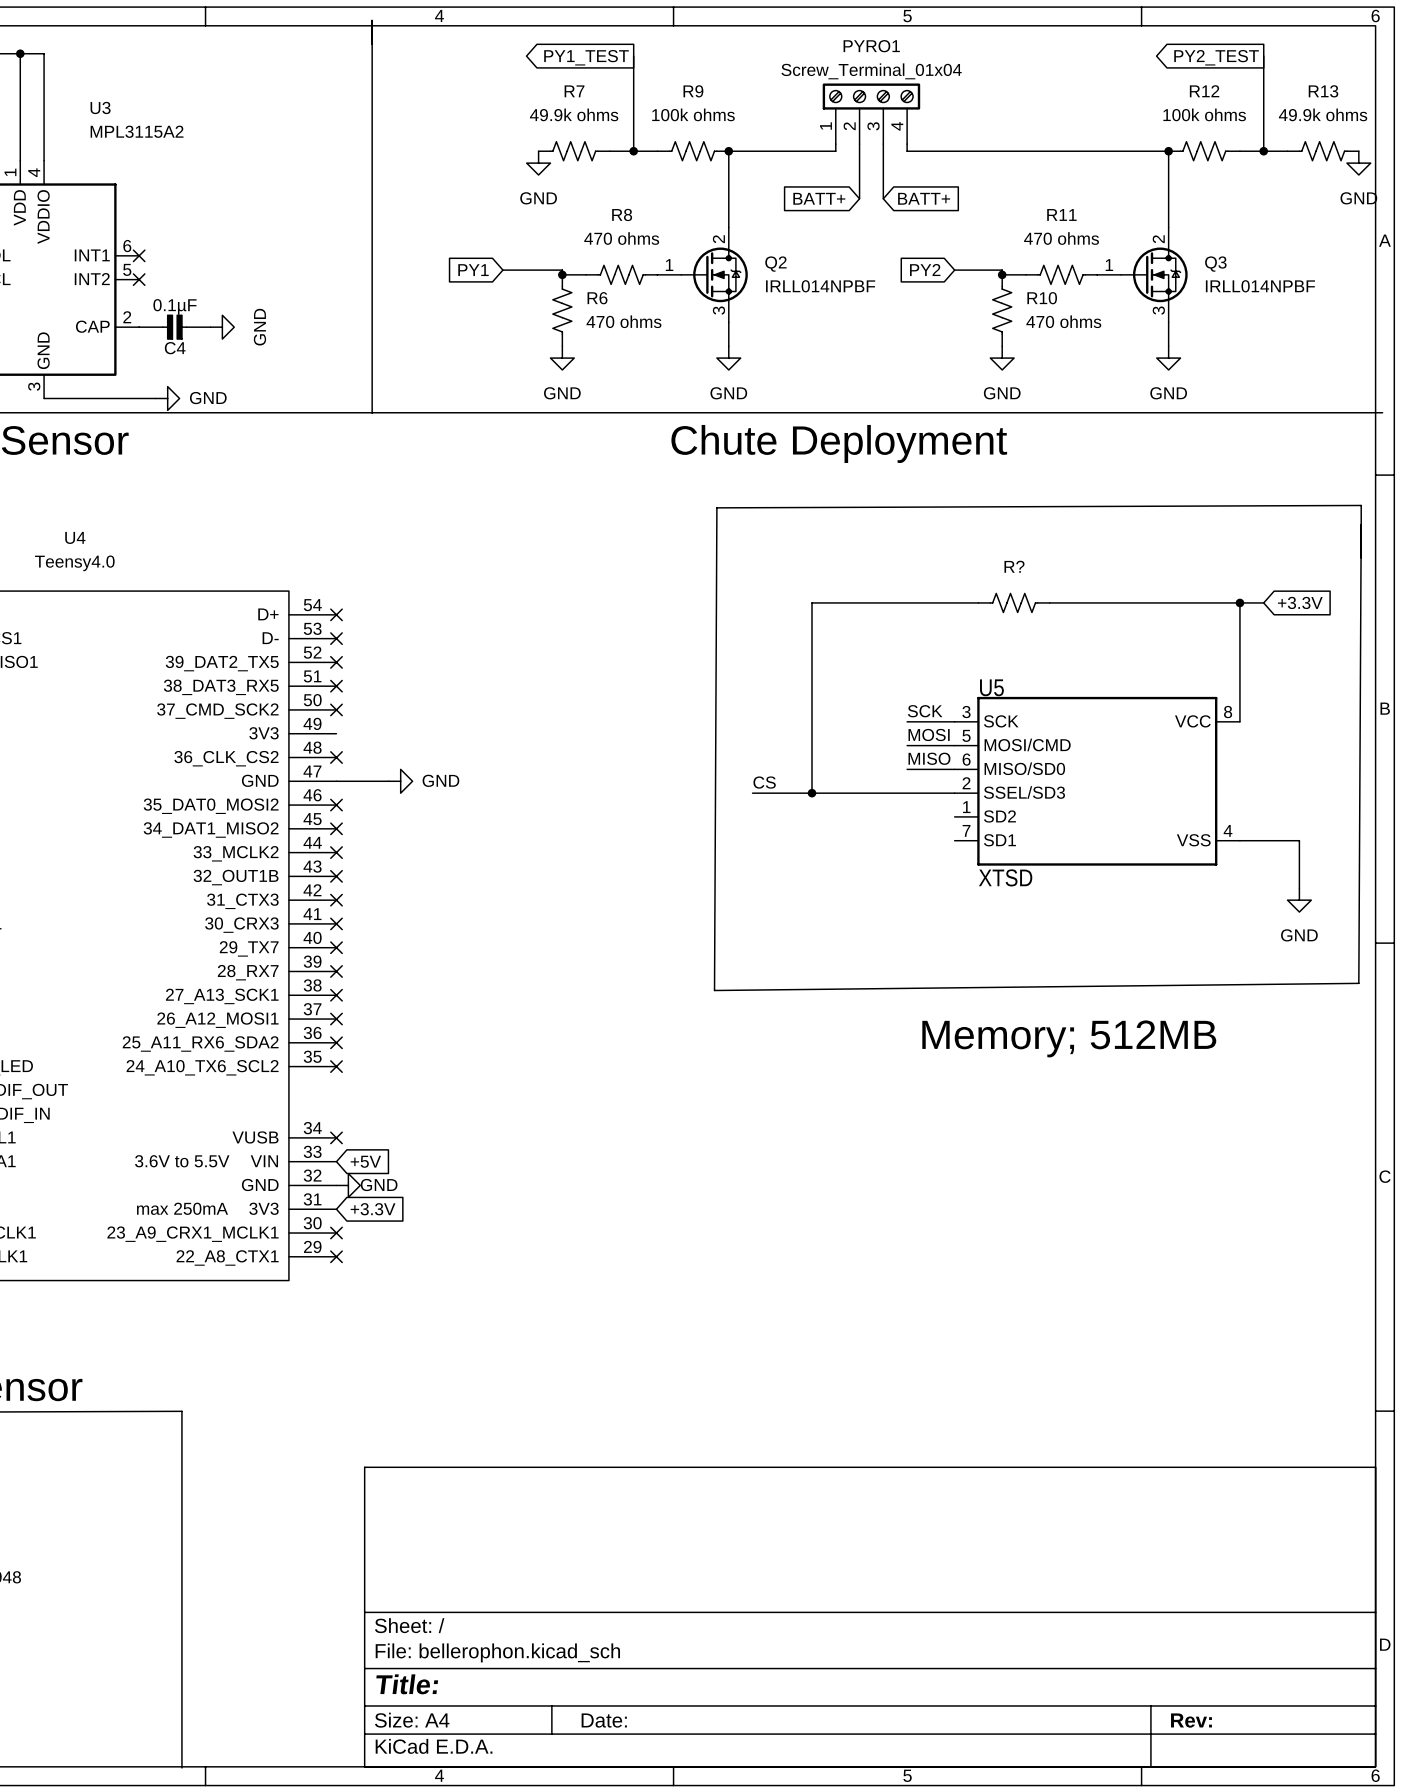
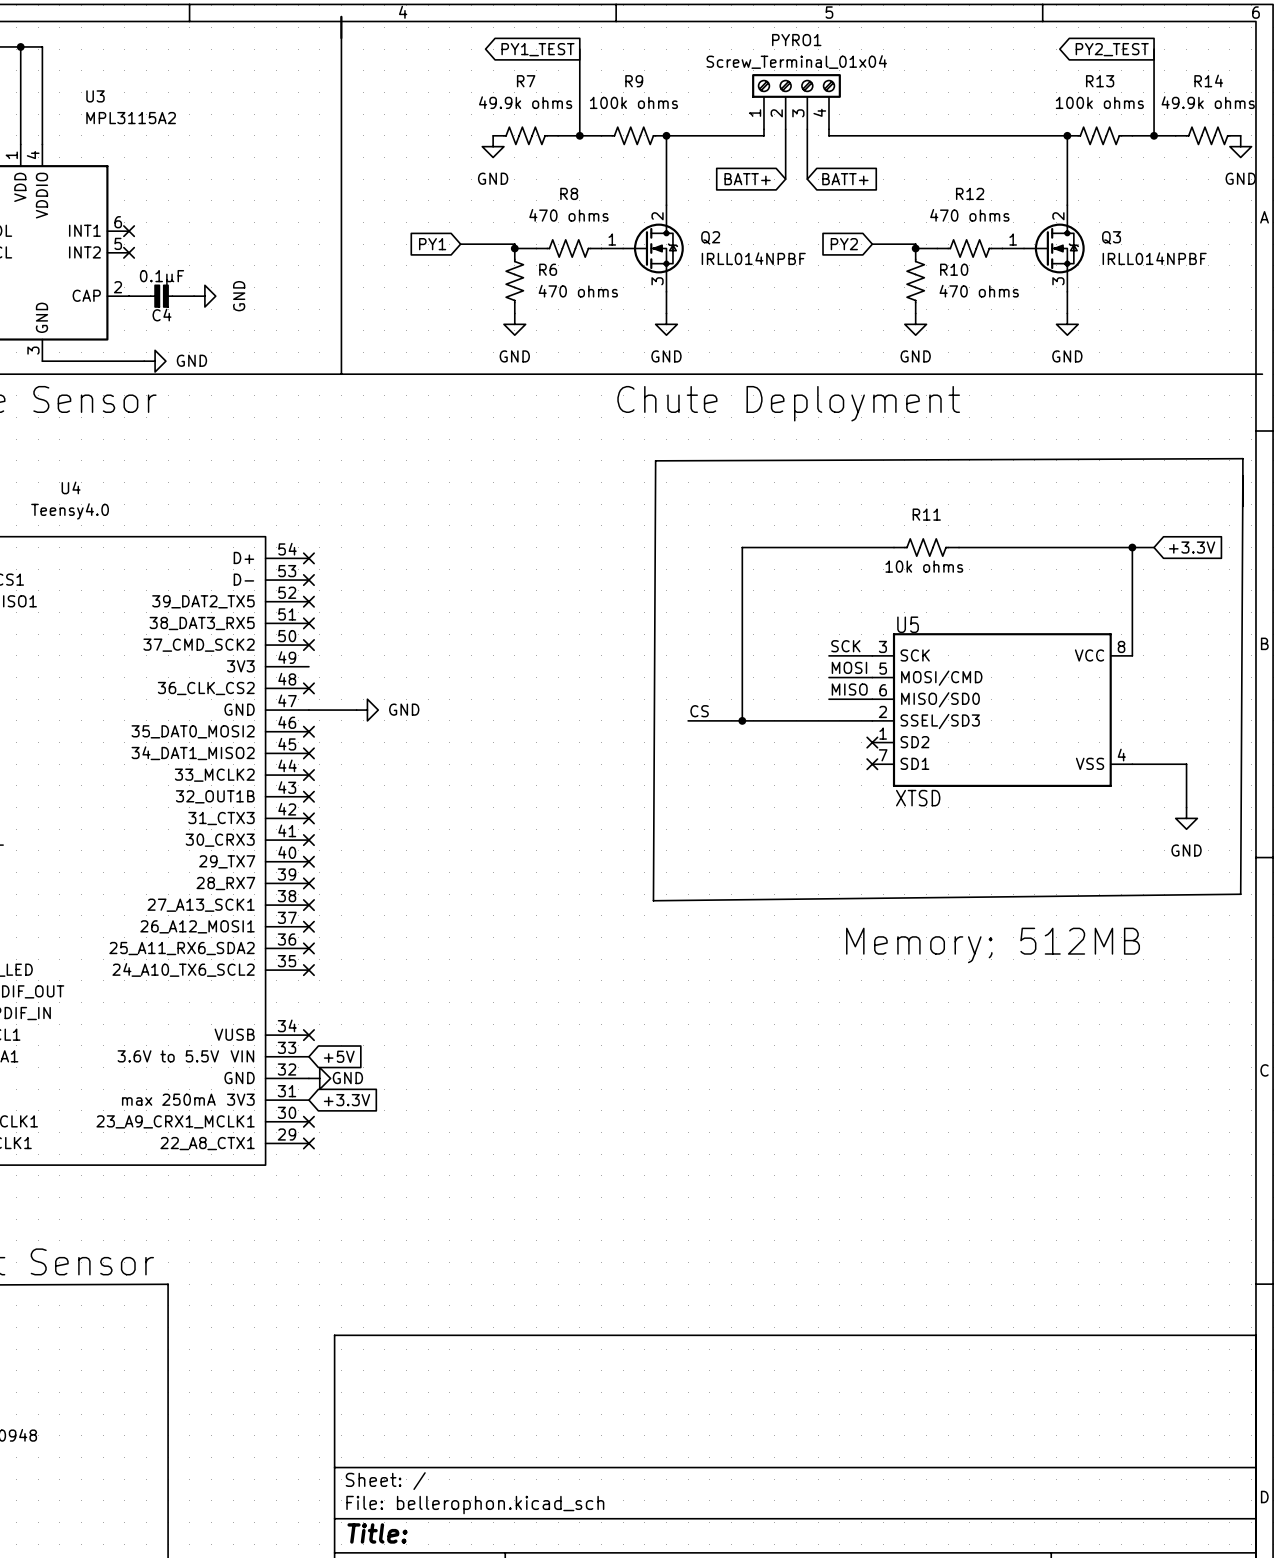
R12 name: R12 (1204, 91) -> R13 (1100, 81)
R13 name: R13 (1323, 91) -> R14 (1208, 80)
R11 name: R11 (1061, 214) -> R12 (970, 193)
R? name: R? (1014, 566) -> R11 (926, 514)
R? value: none -> 10k ohms (924, 566)
no-connect mark: none -> (872, 742)
no-connect mark: none -> (872, 764)

